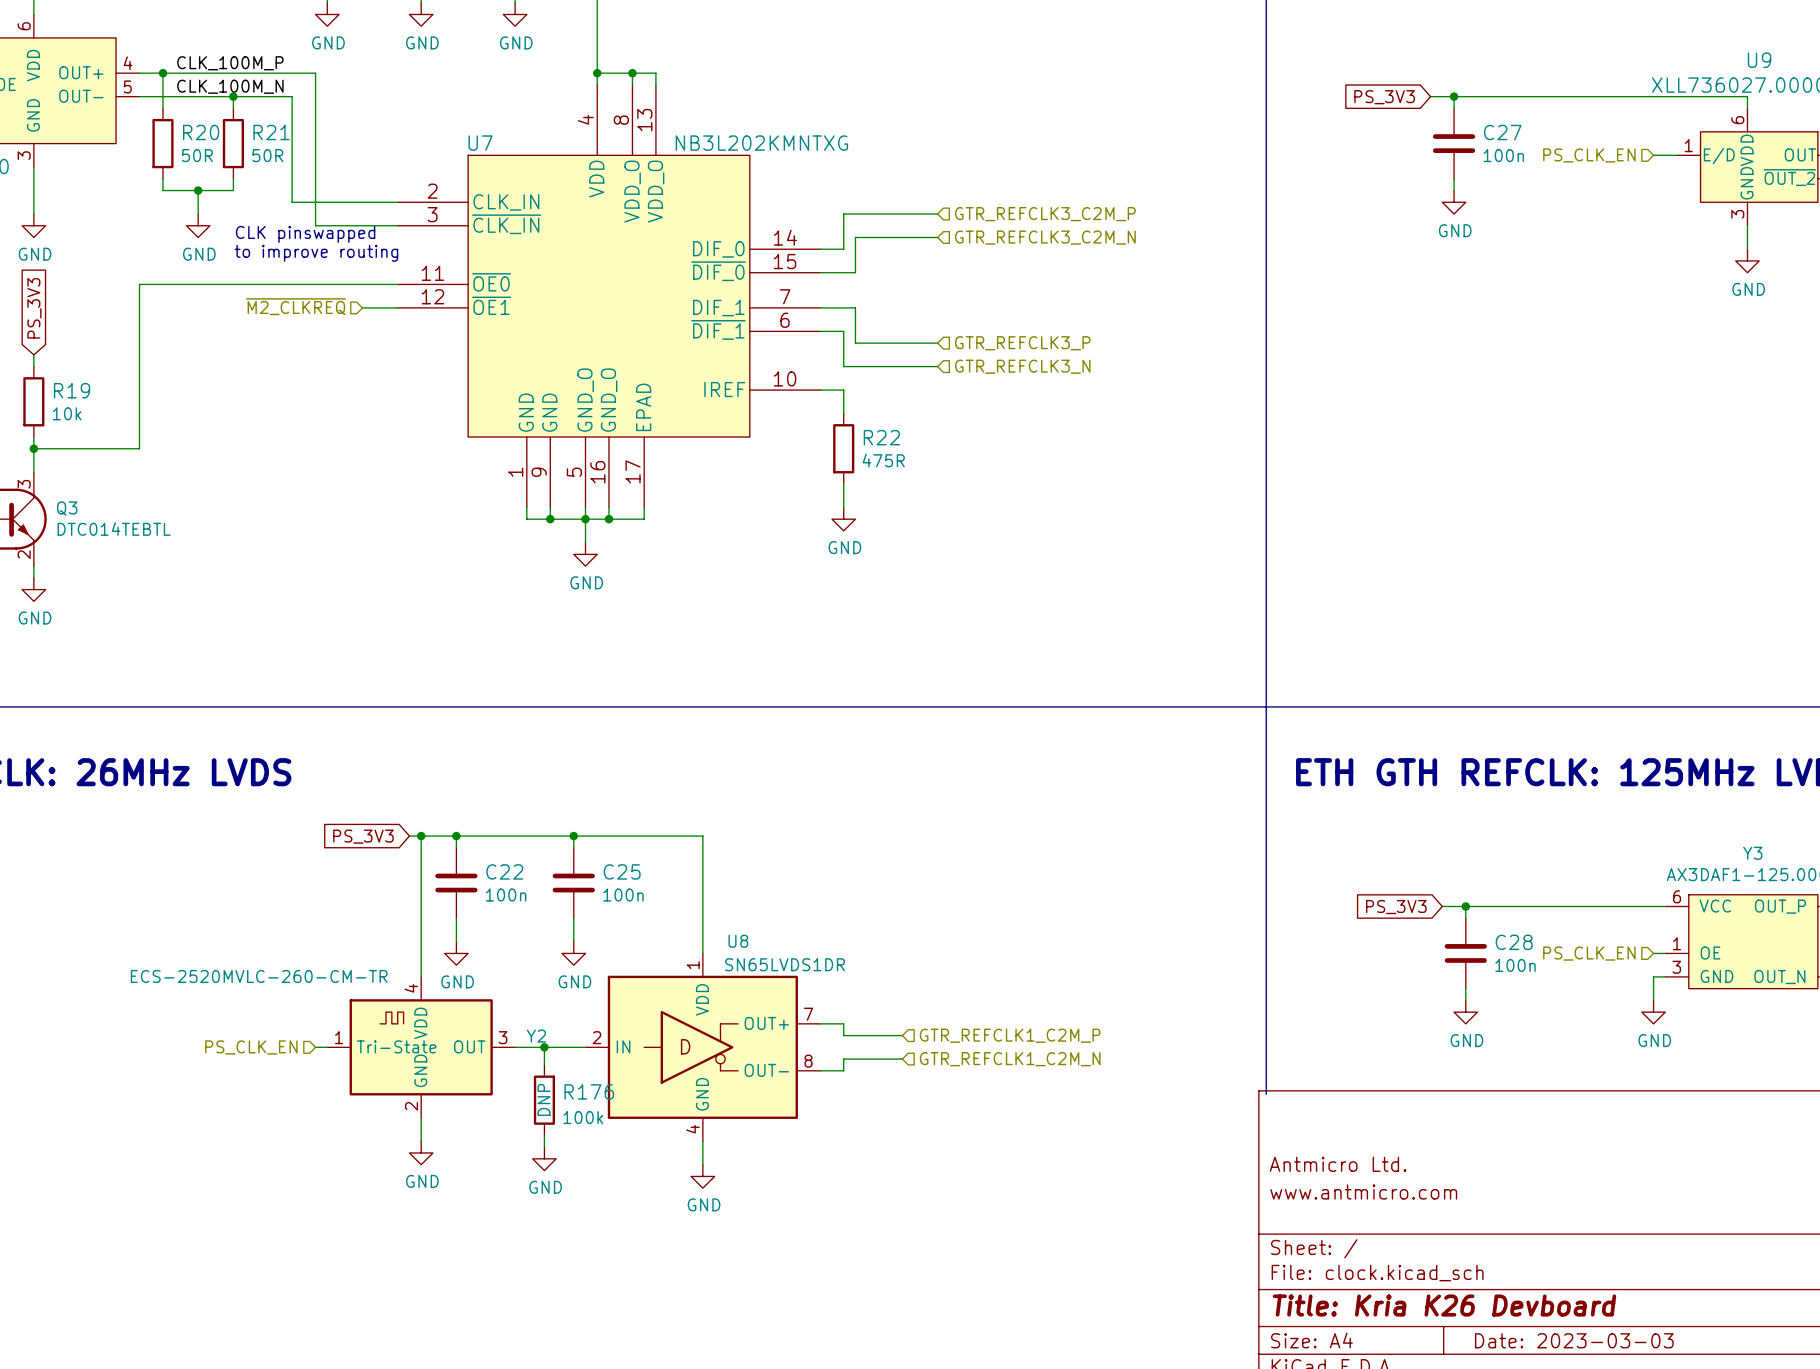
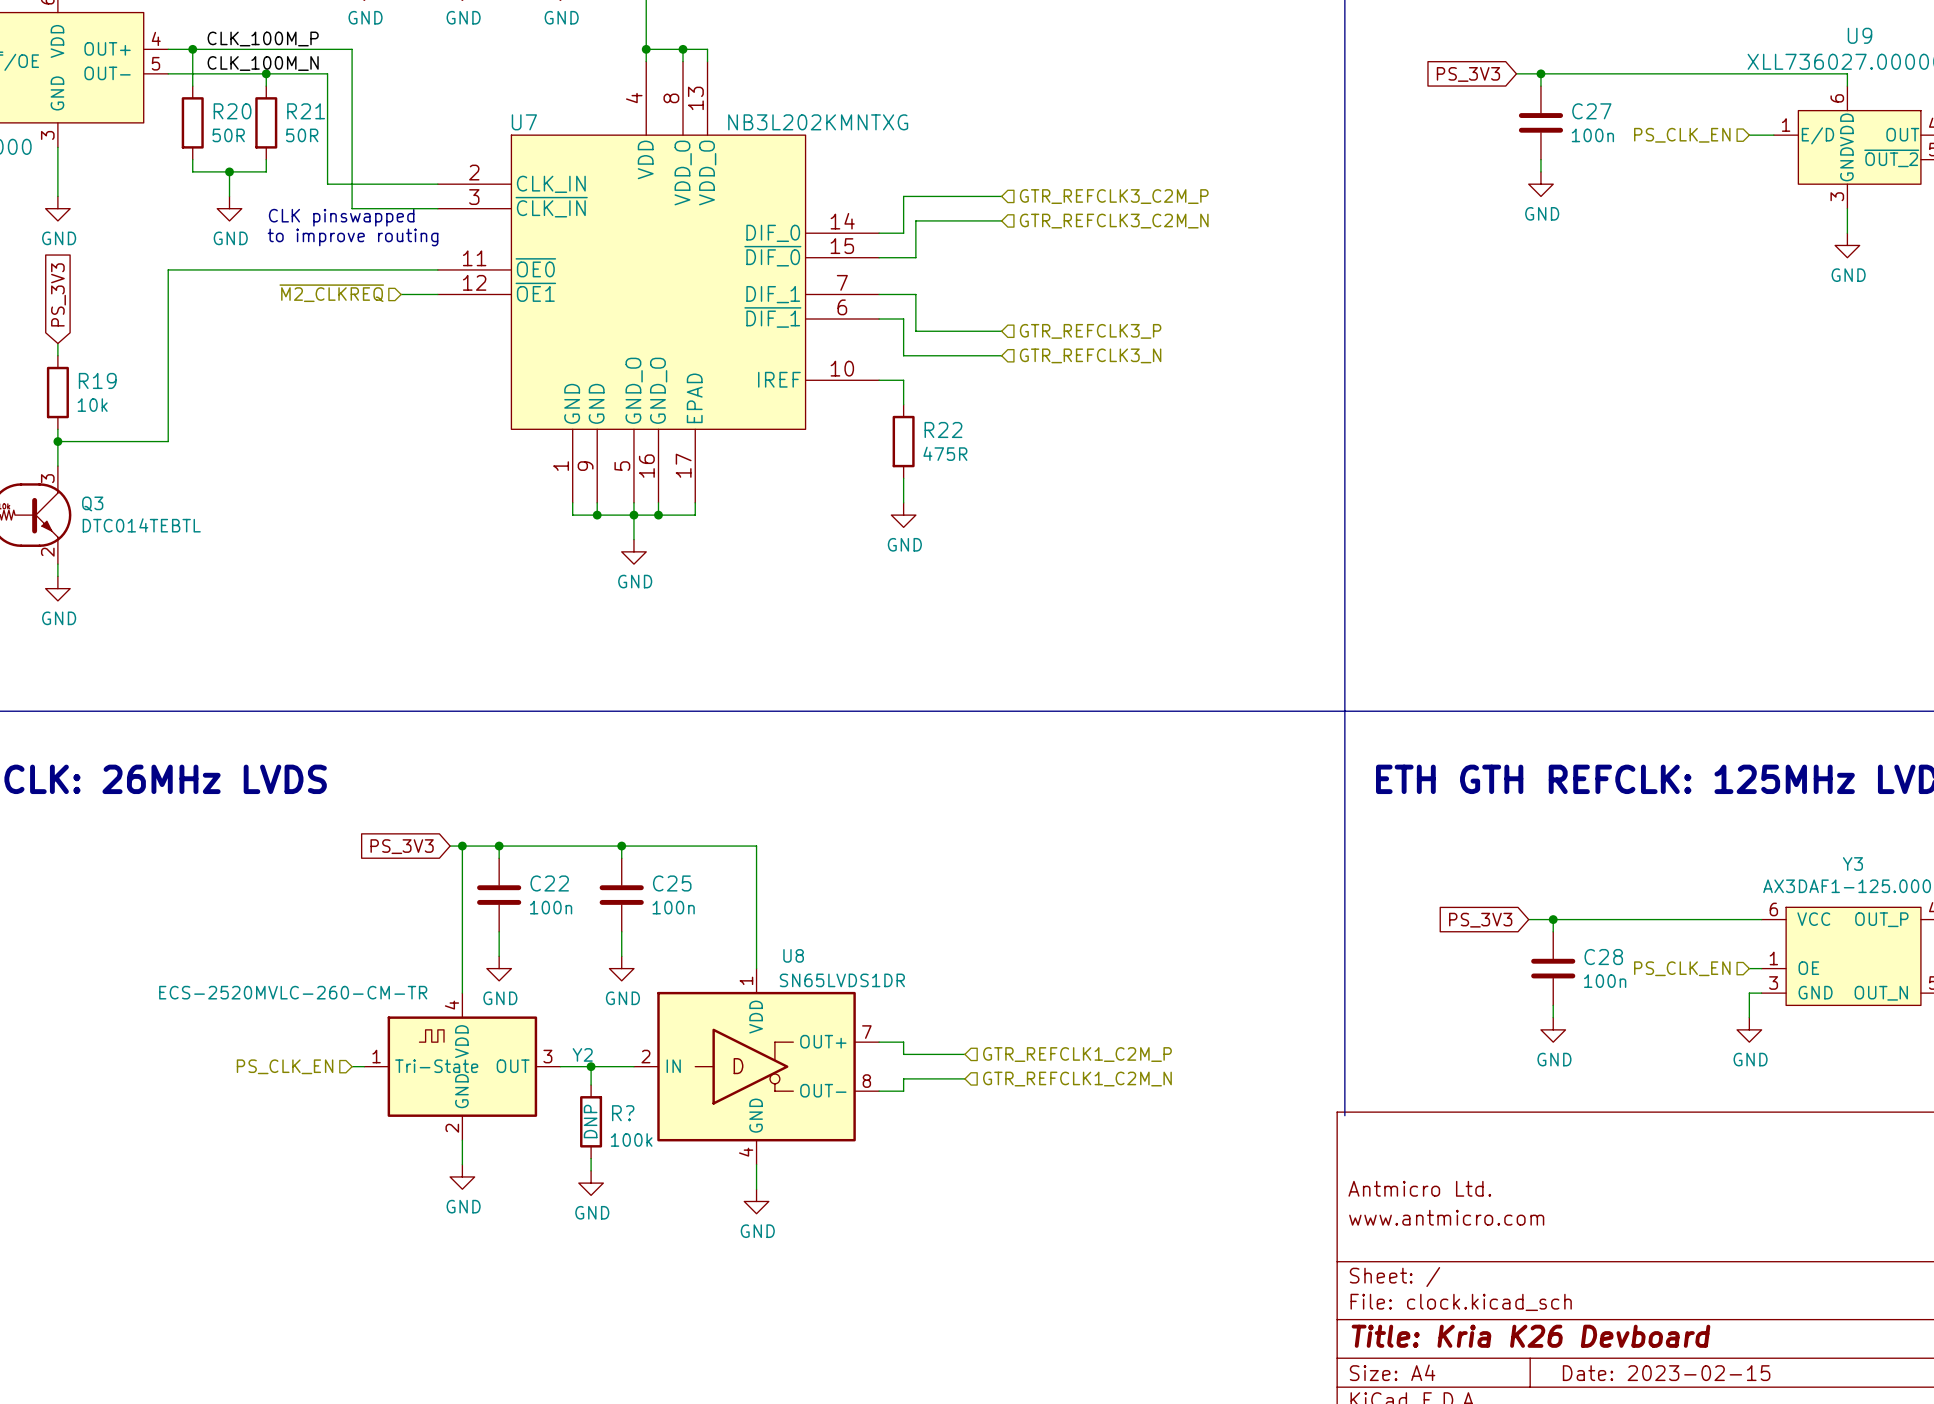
R176 name: R176 (589, 1091) -> R? (623, 1113)
title block: Date: 2023-03-03 (1574, 1340) -> Date: 2023-02-15 (1666, 1373)

